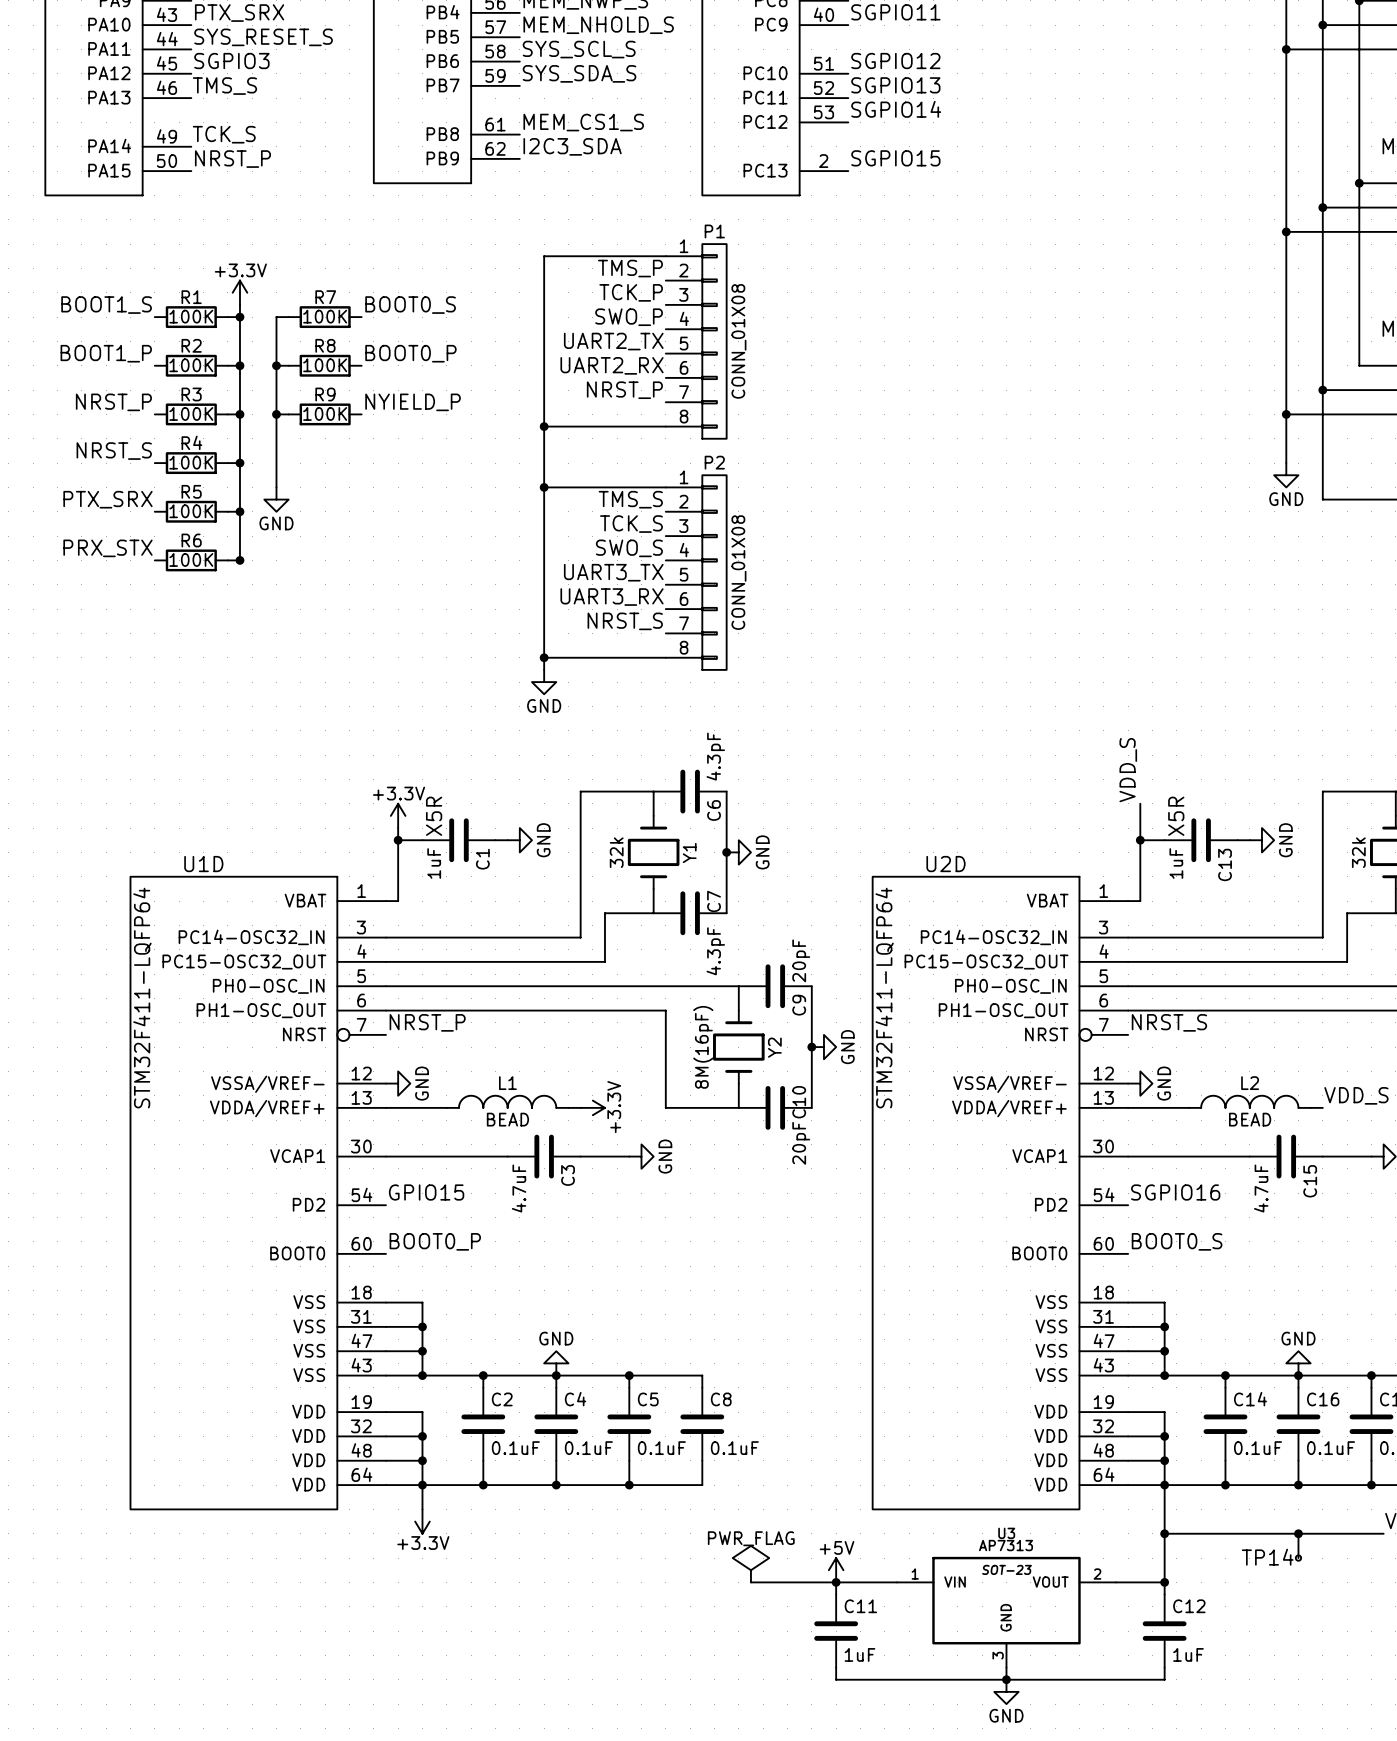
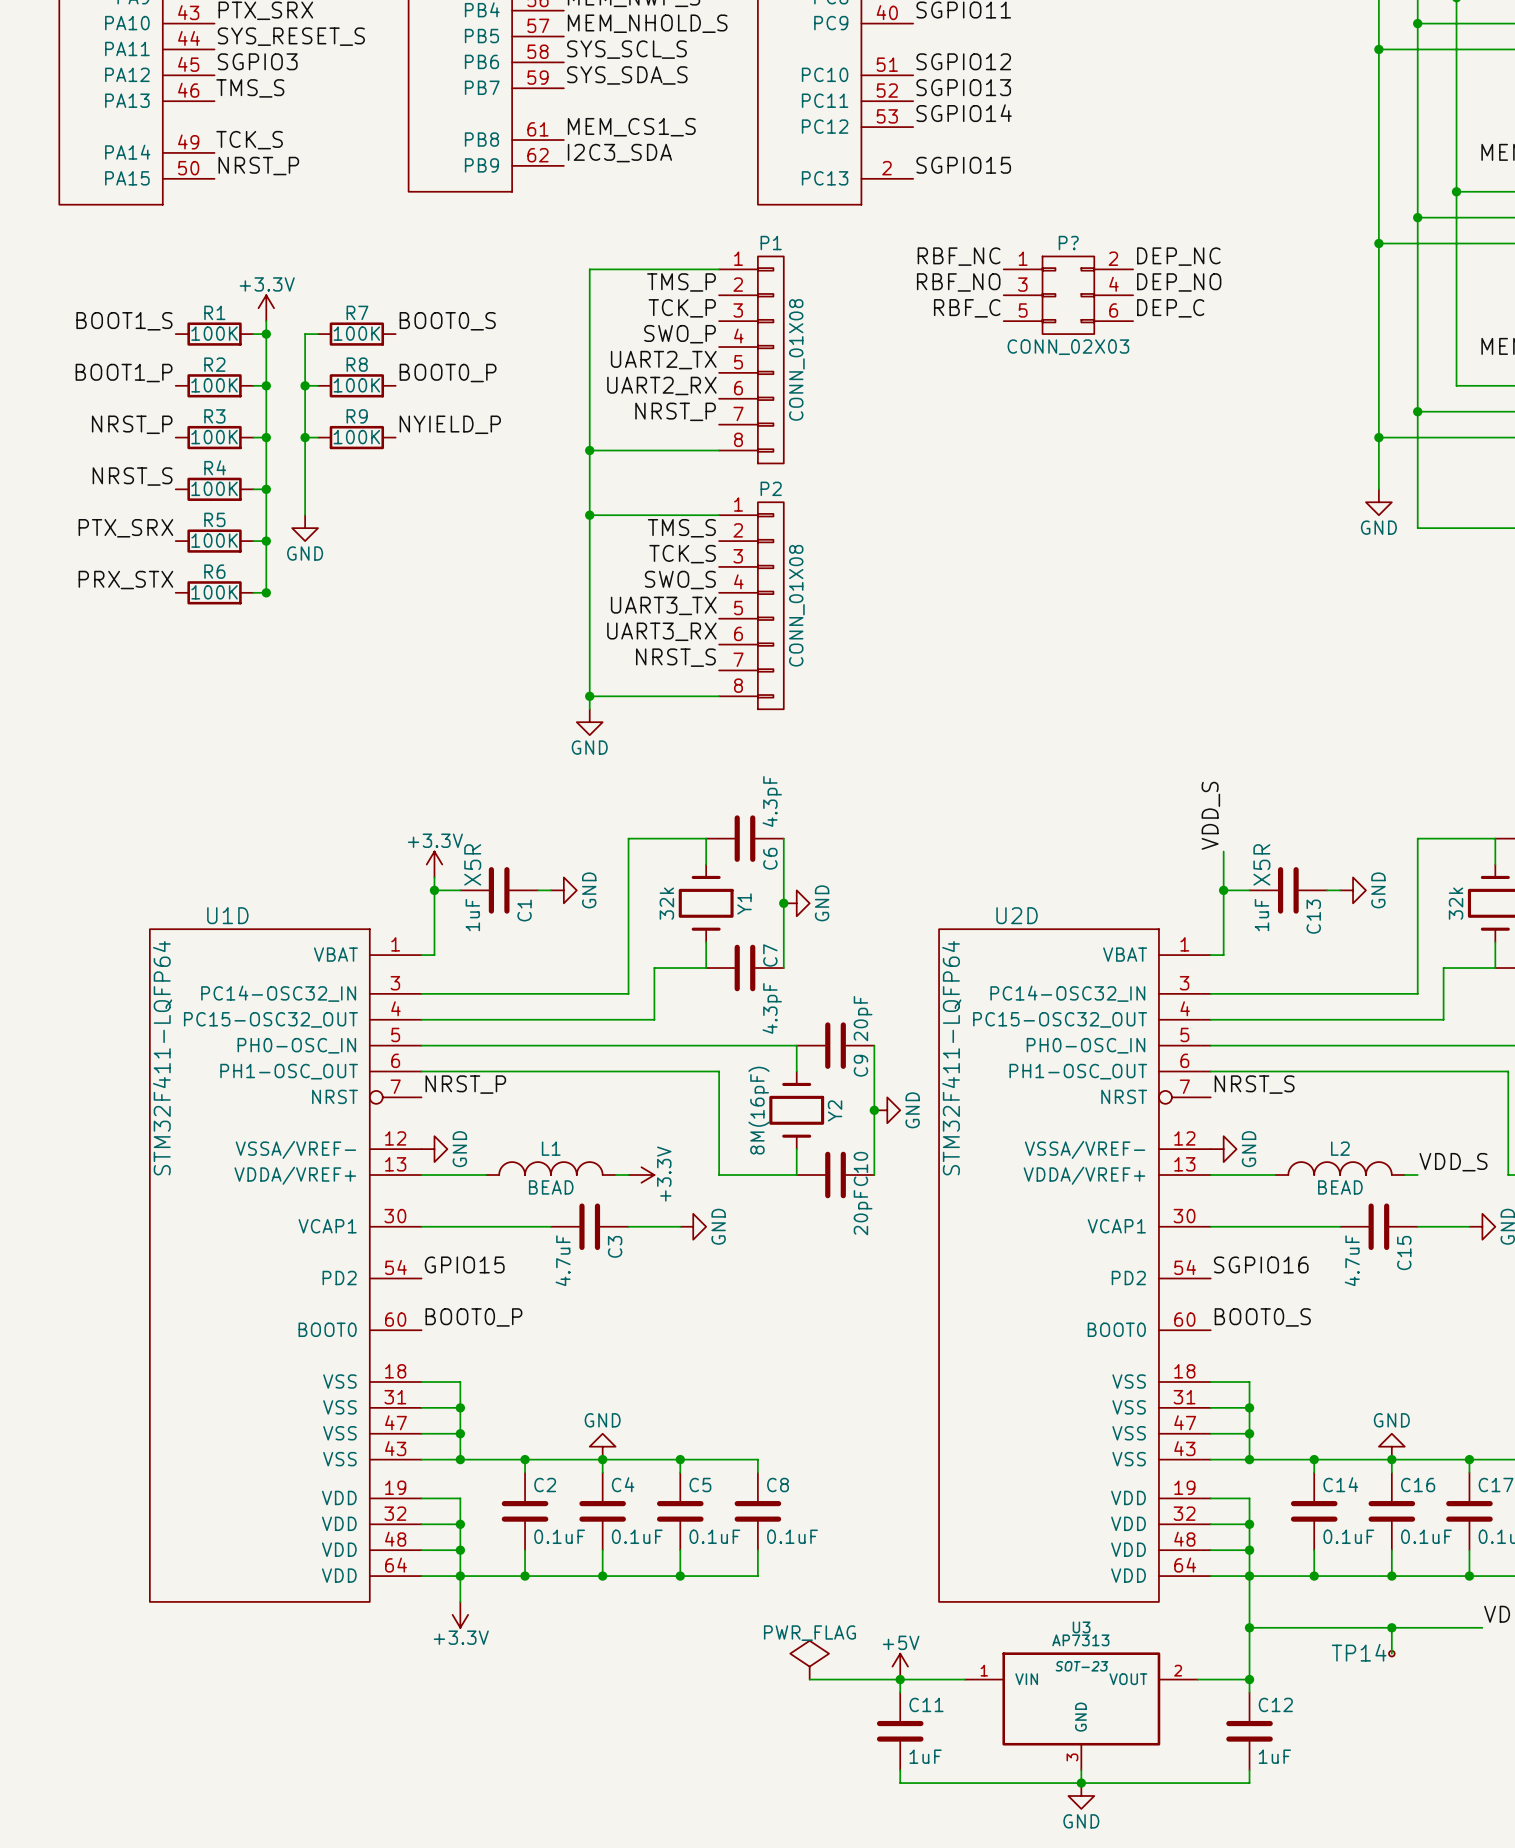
label: none -> RBF_NC (959, 256)
label: none -> DEP_NC (1178, 256)
label: none -> RBF_NO (958, 282)
label: none -> DEP_NO (1179, 282)
P?: none -> CONN_02X03 (1068, 295)
label: none -> RBF_C (967, 308)
label: none -> DEP_C (1170, 308)

